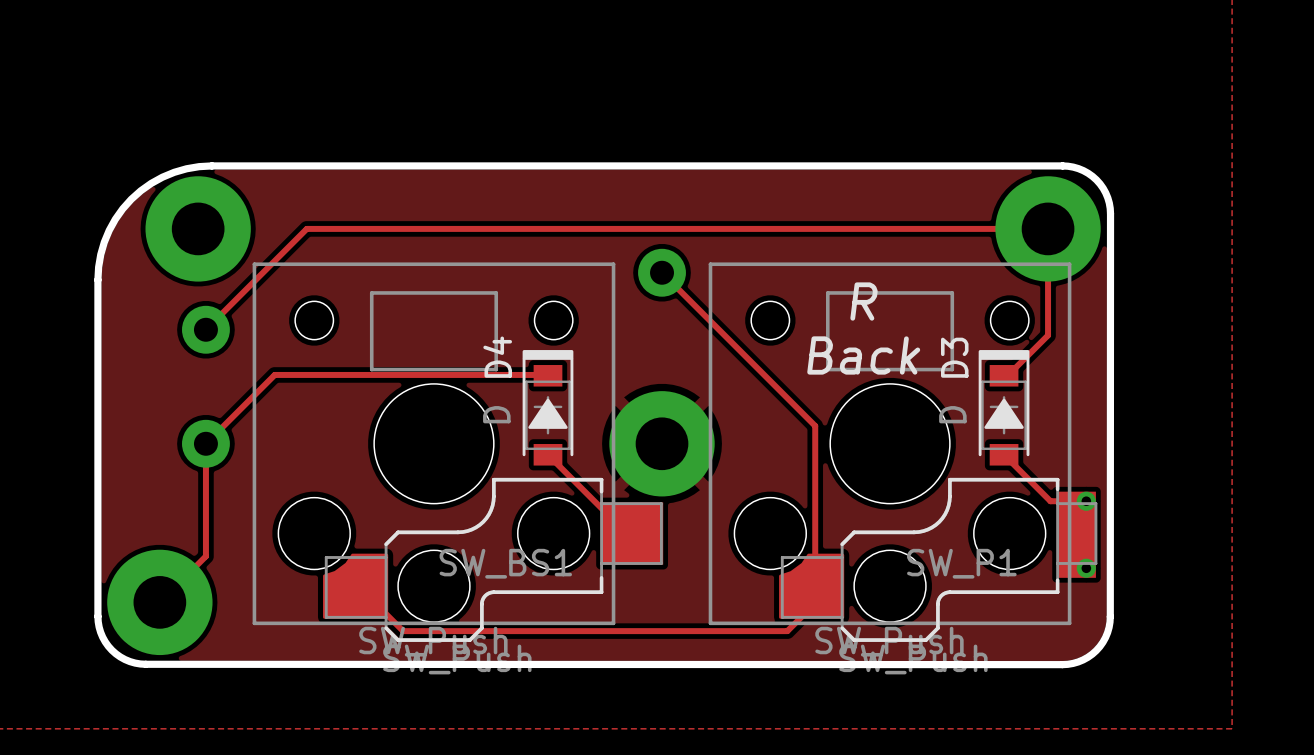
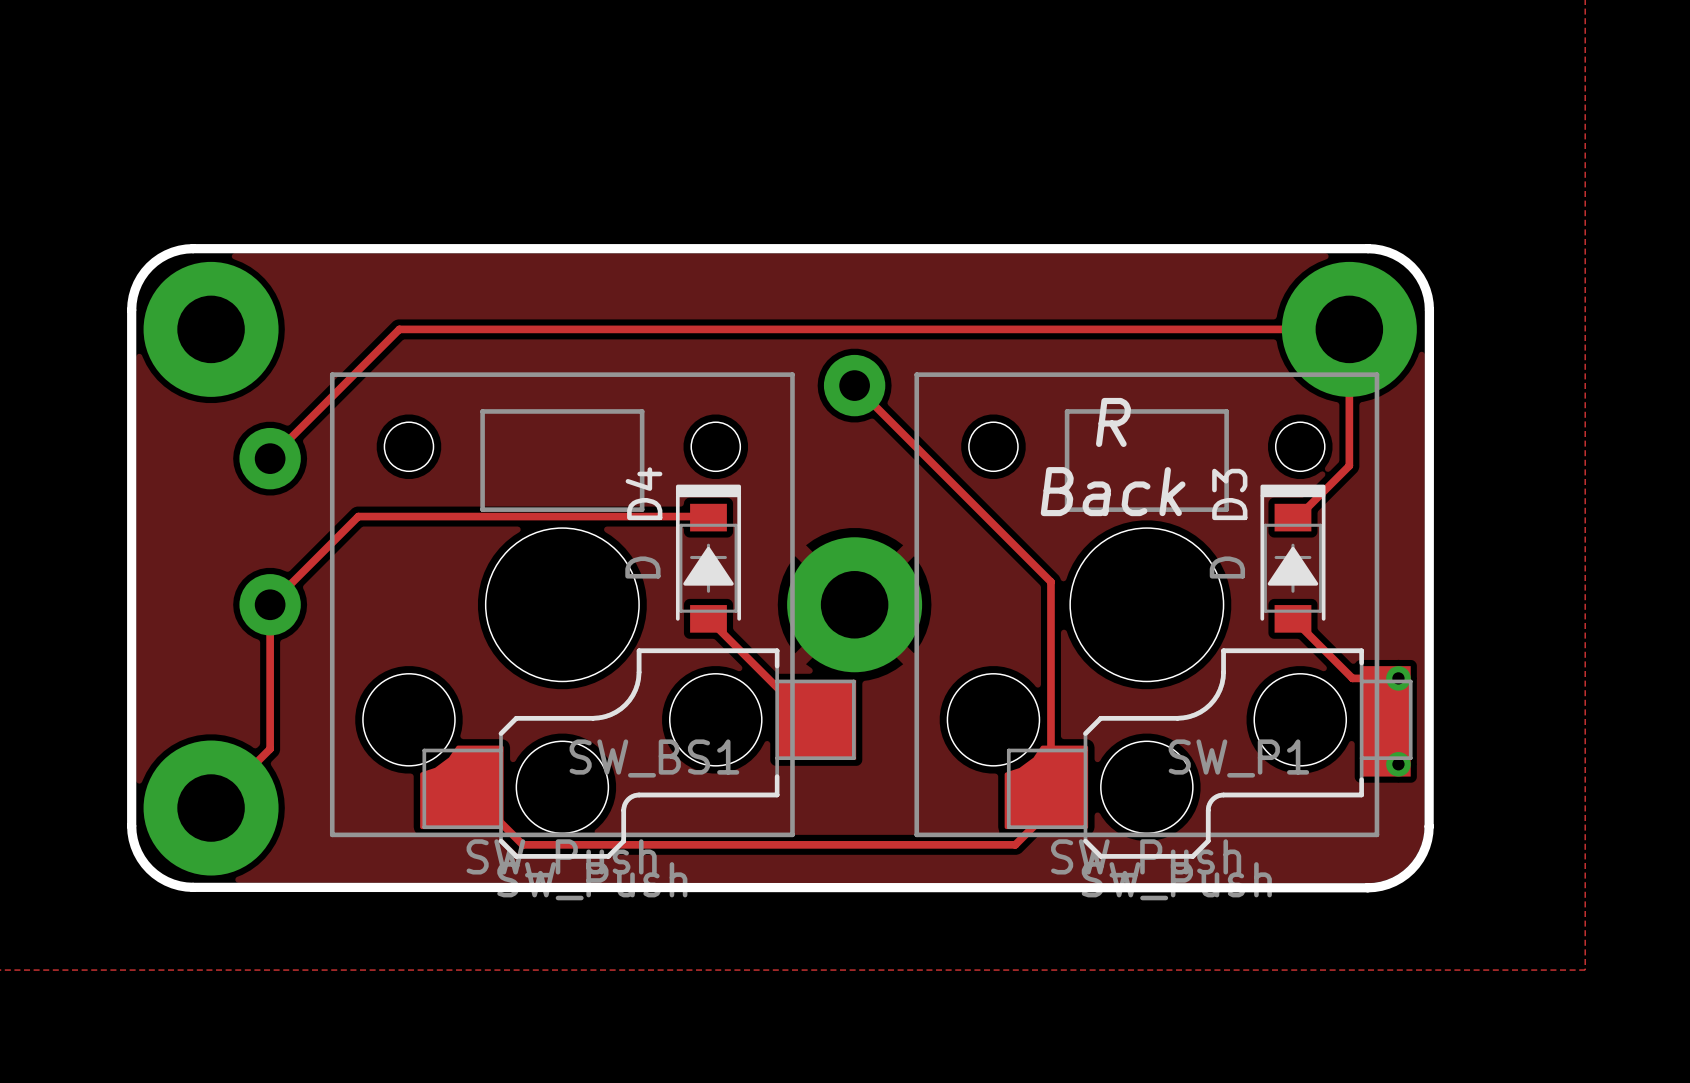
drawing shape: [94, 162, 1115, 669] -> [127, 244, 1435, 893]
part position: (198, 228) -> (211, 329)

